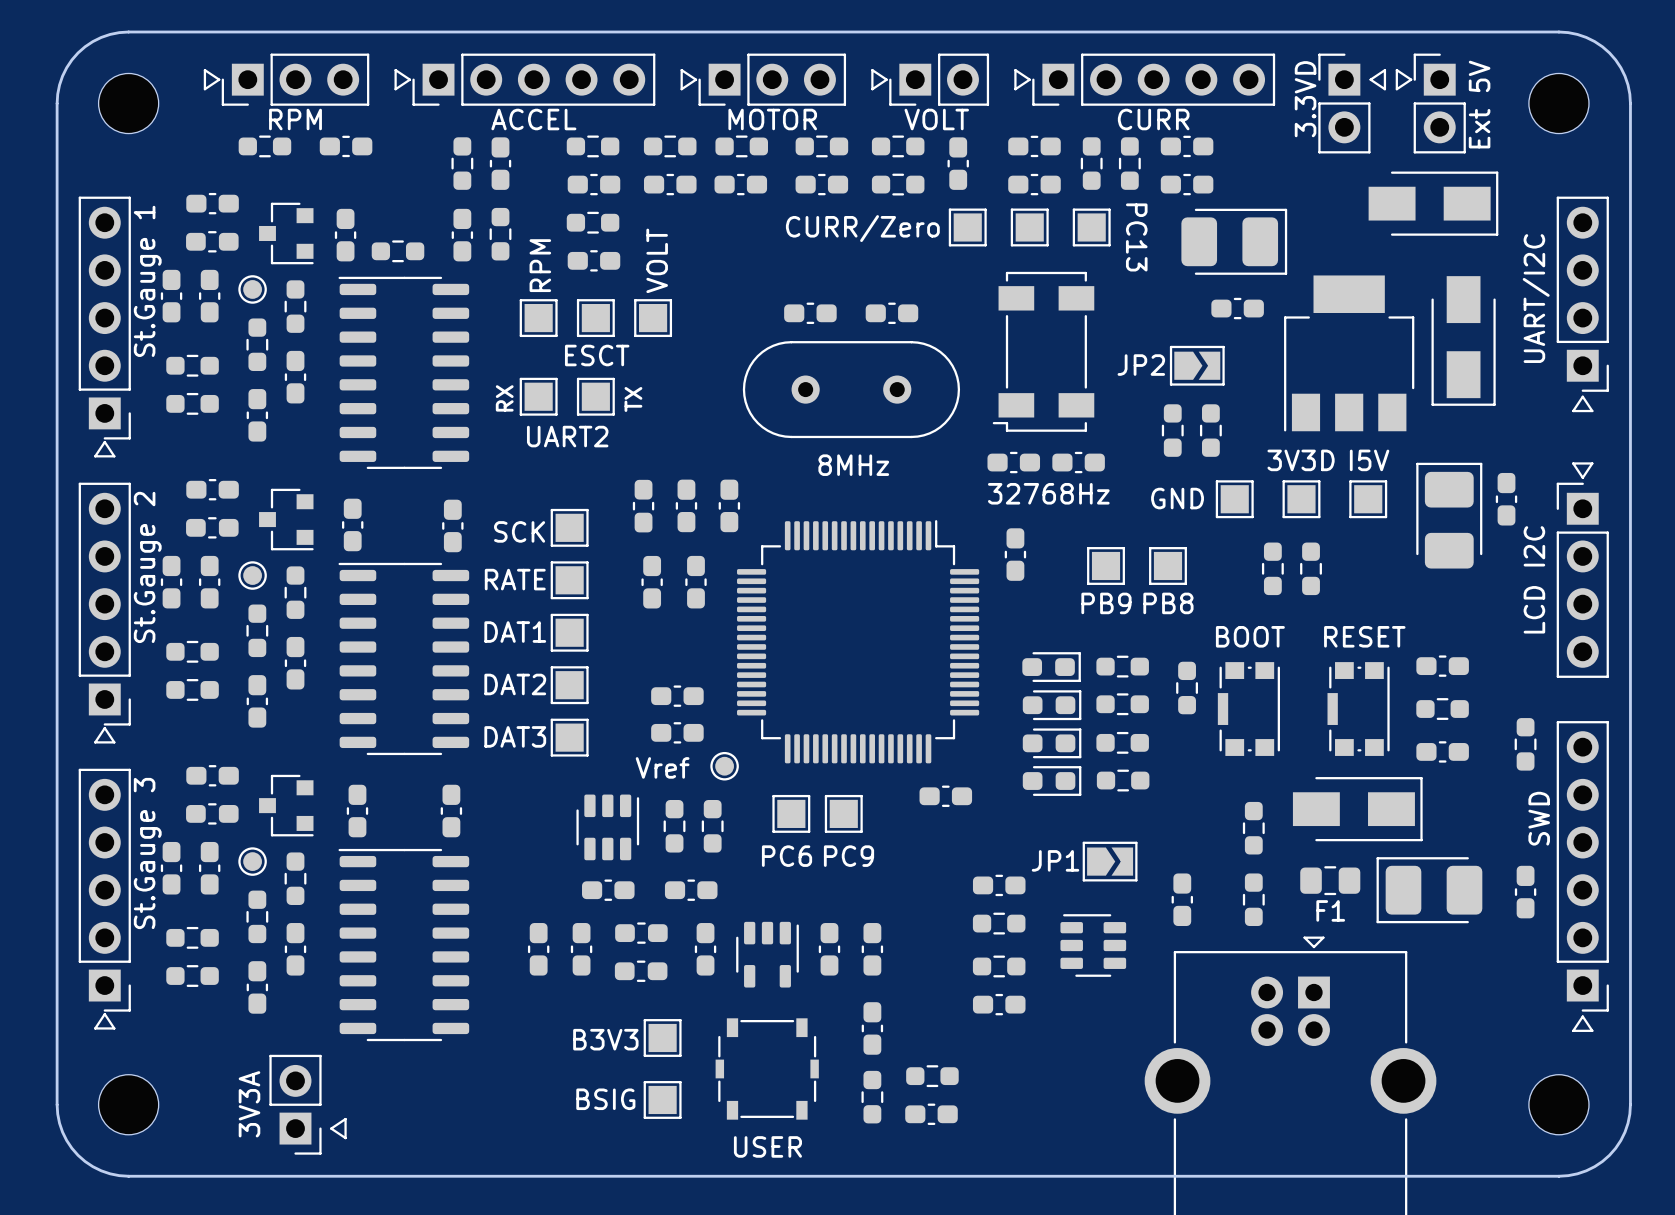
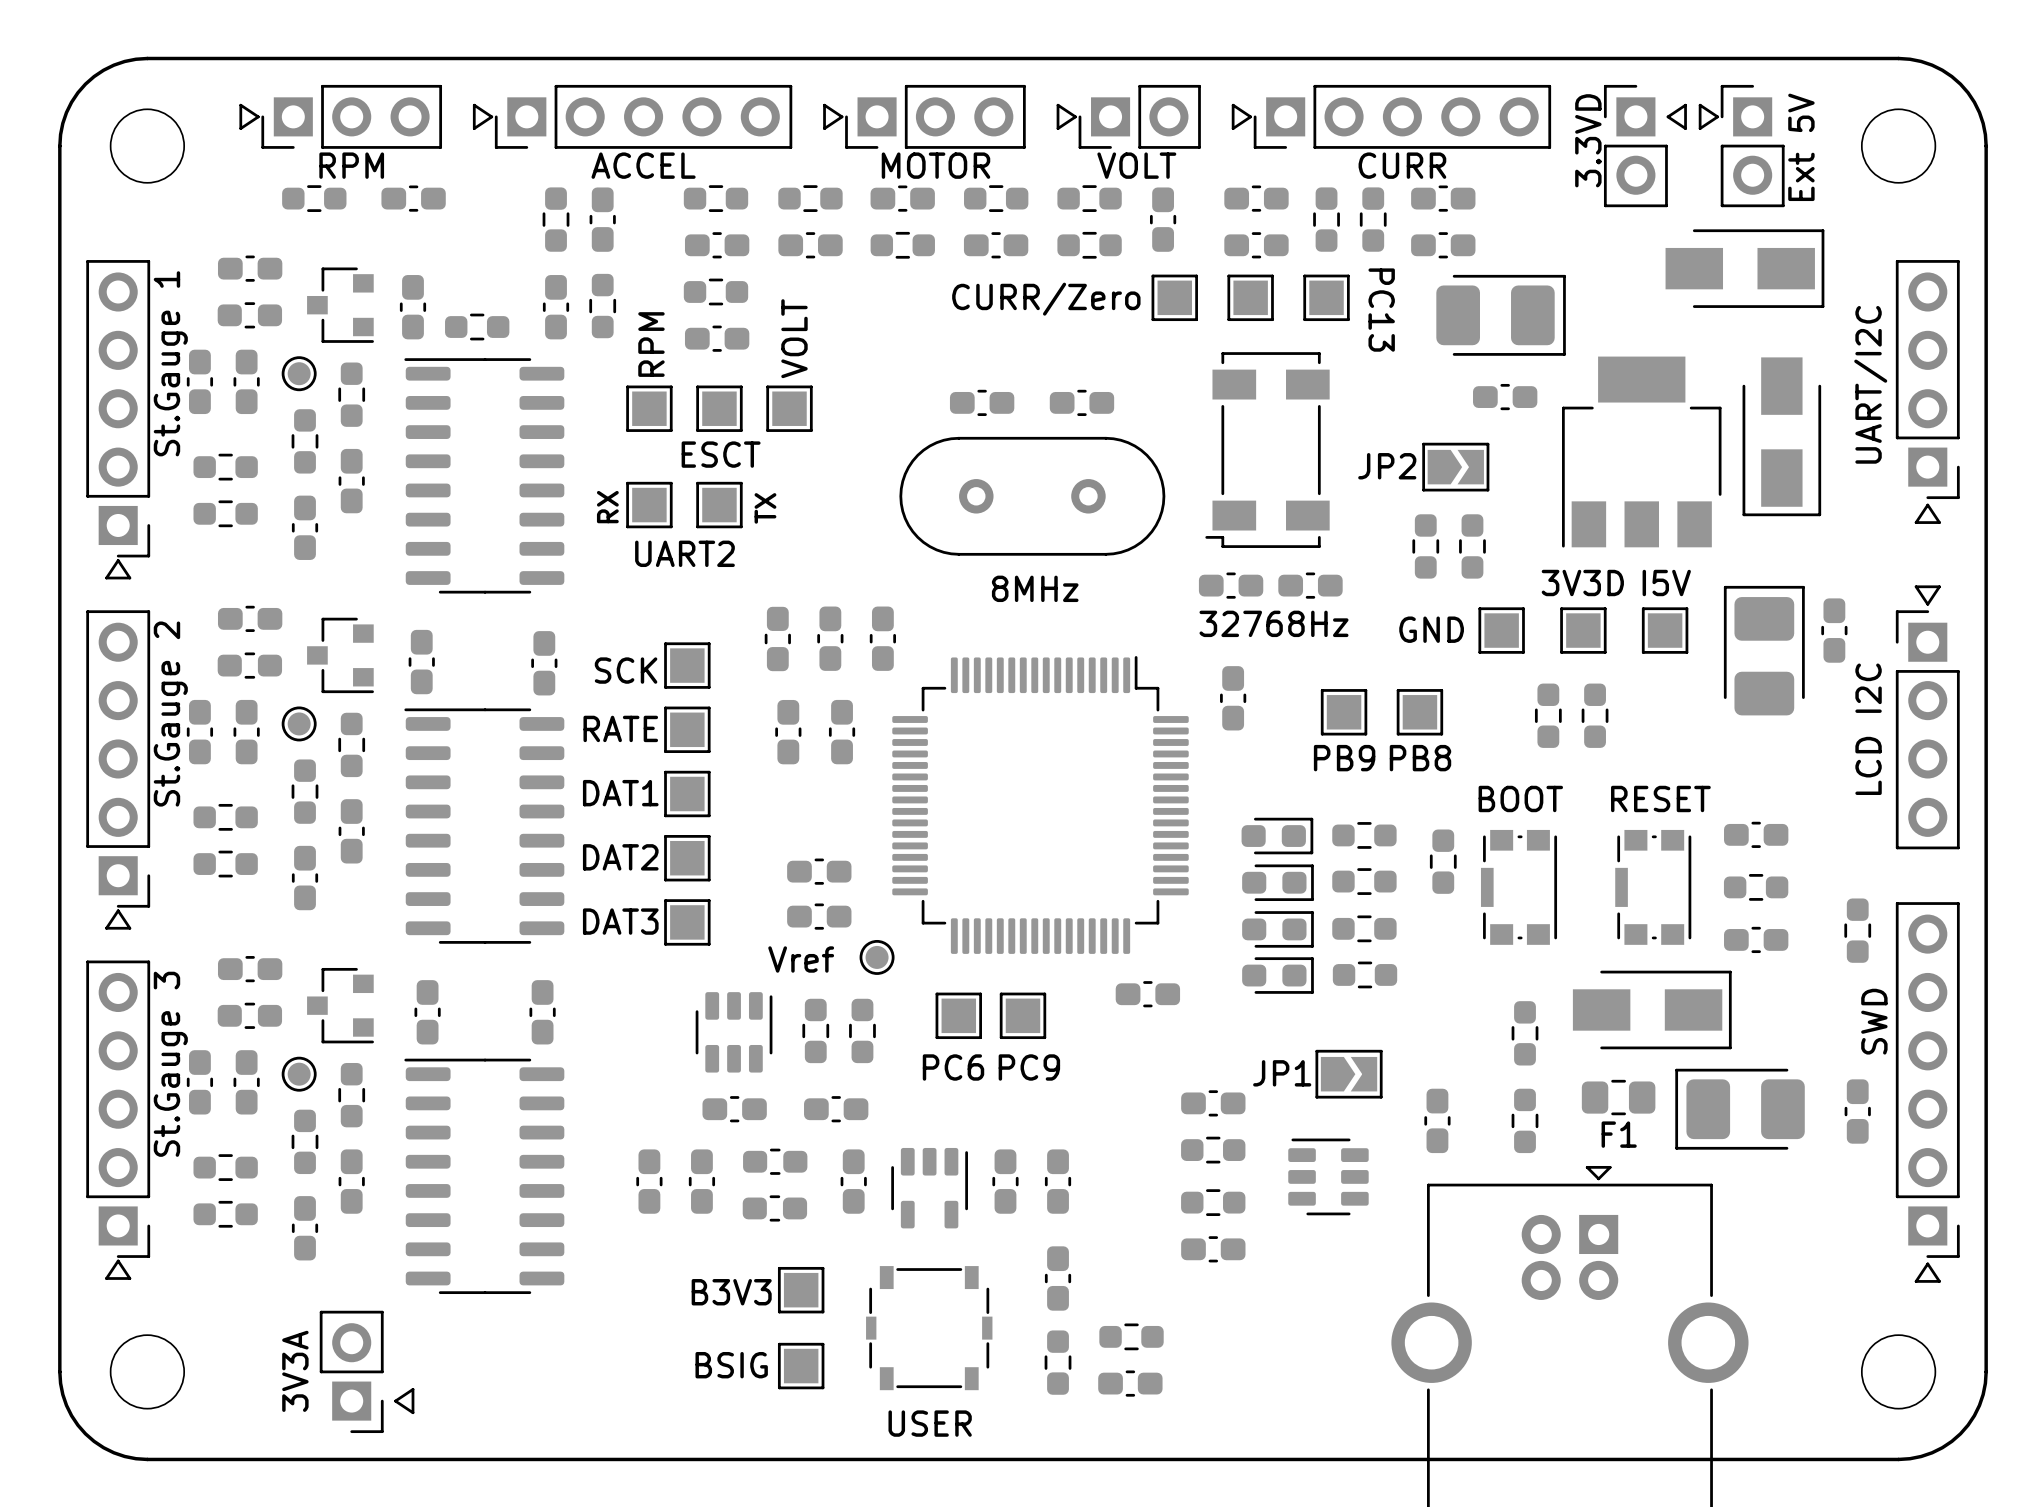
part footprint: [715, 135, 769, 158] -> [870, 185, 935, 212]
part footprint: [714, 173, 768, 196] -> [870, 231, 935, 259]

